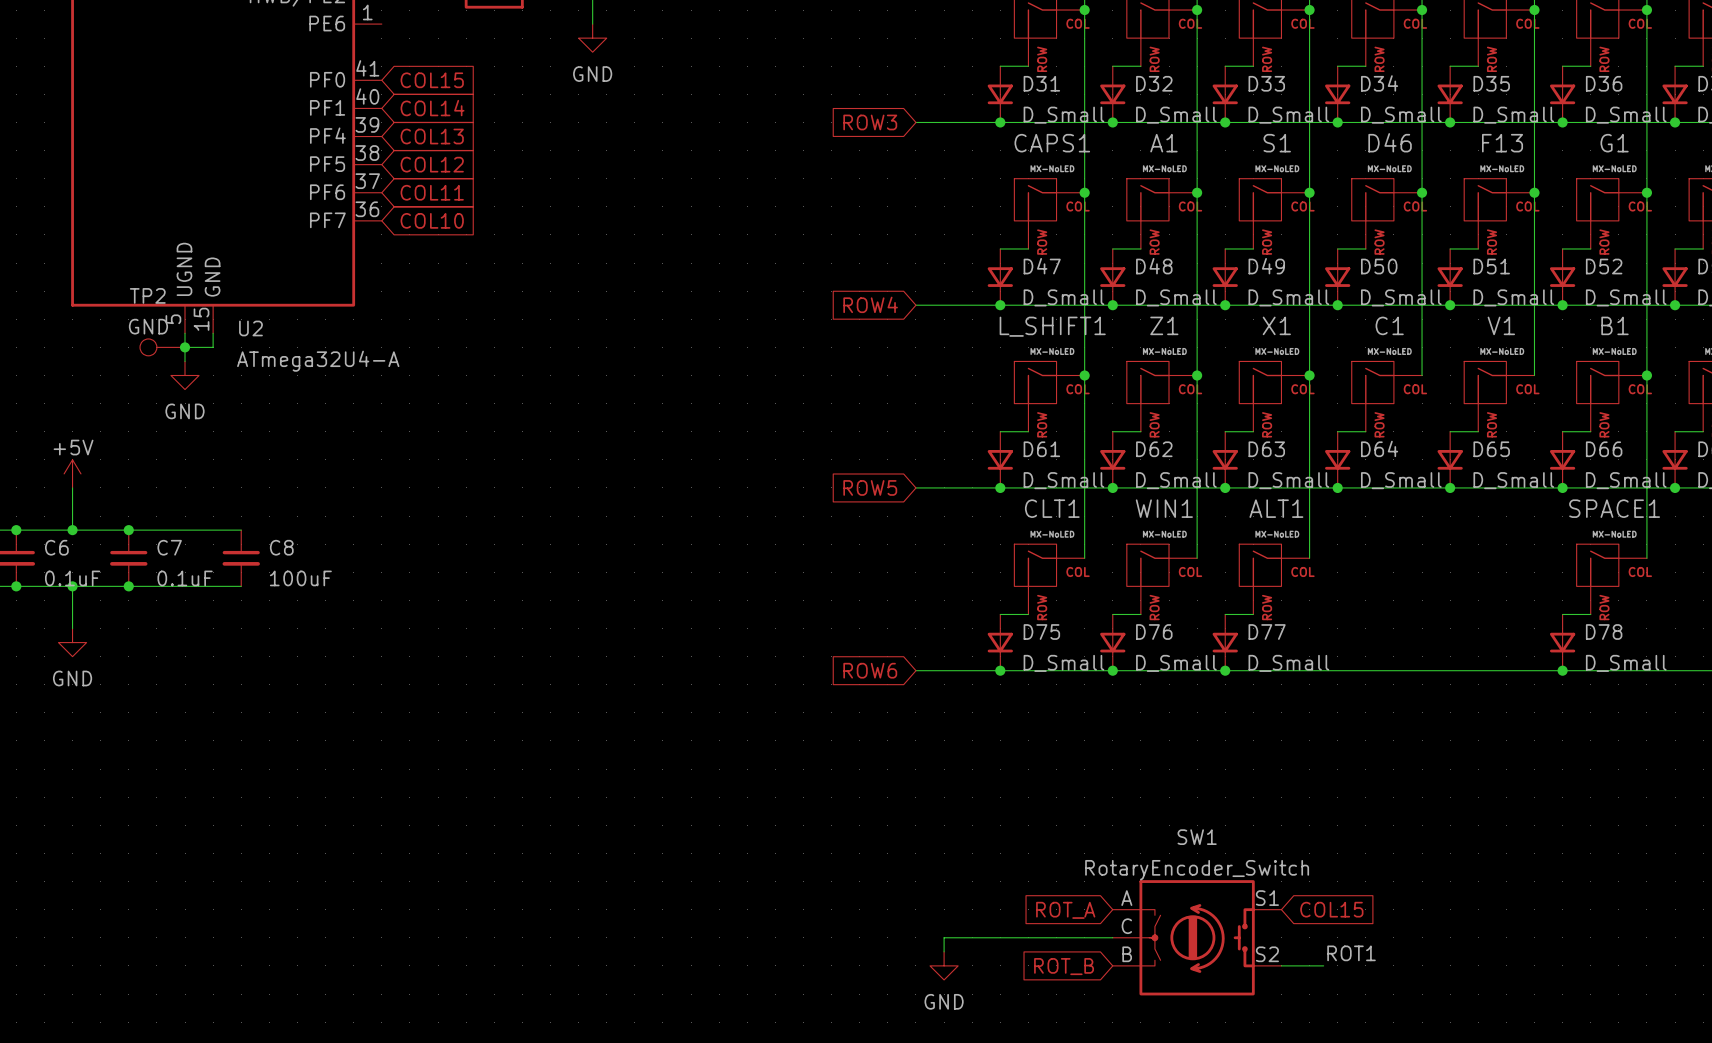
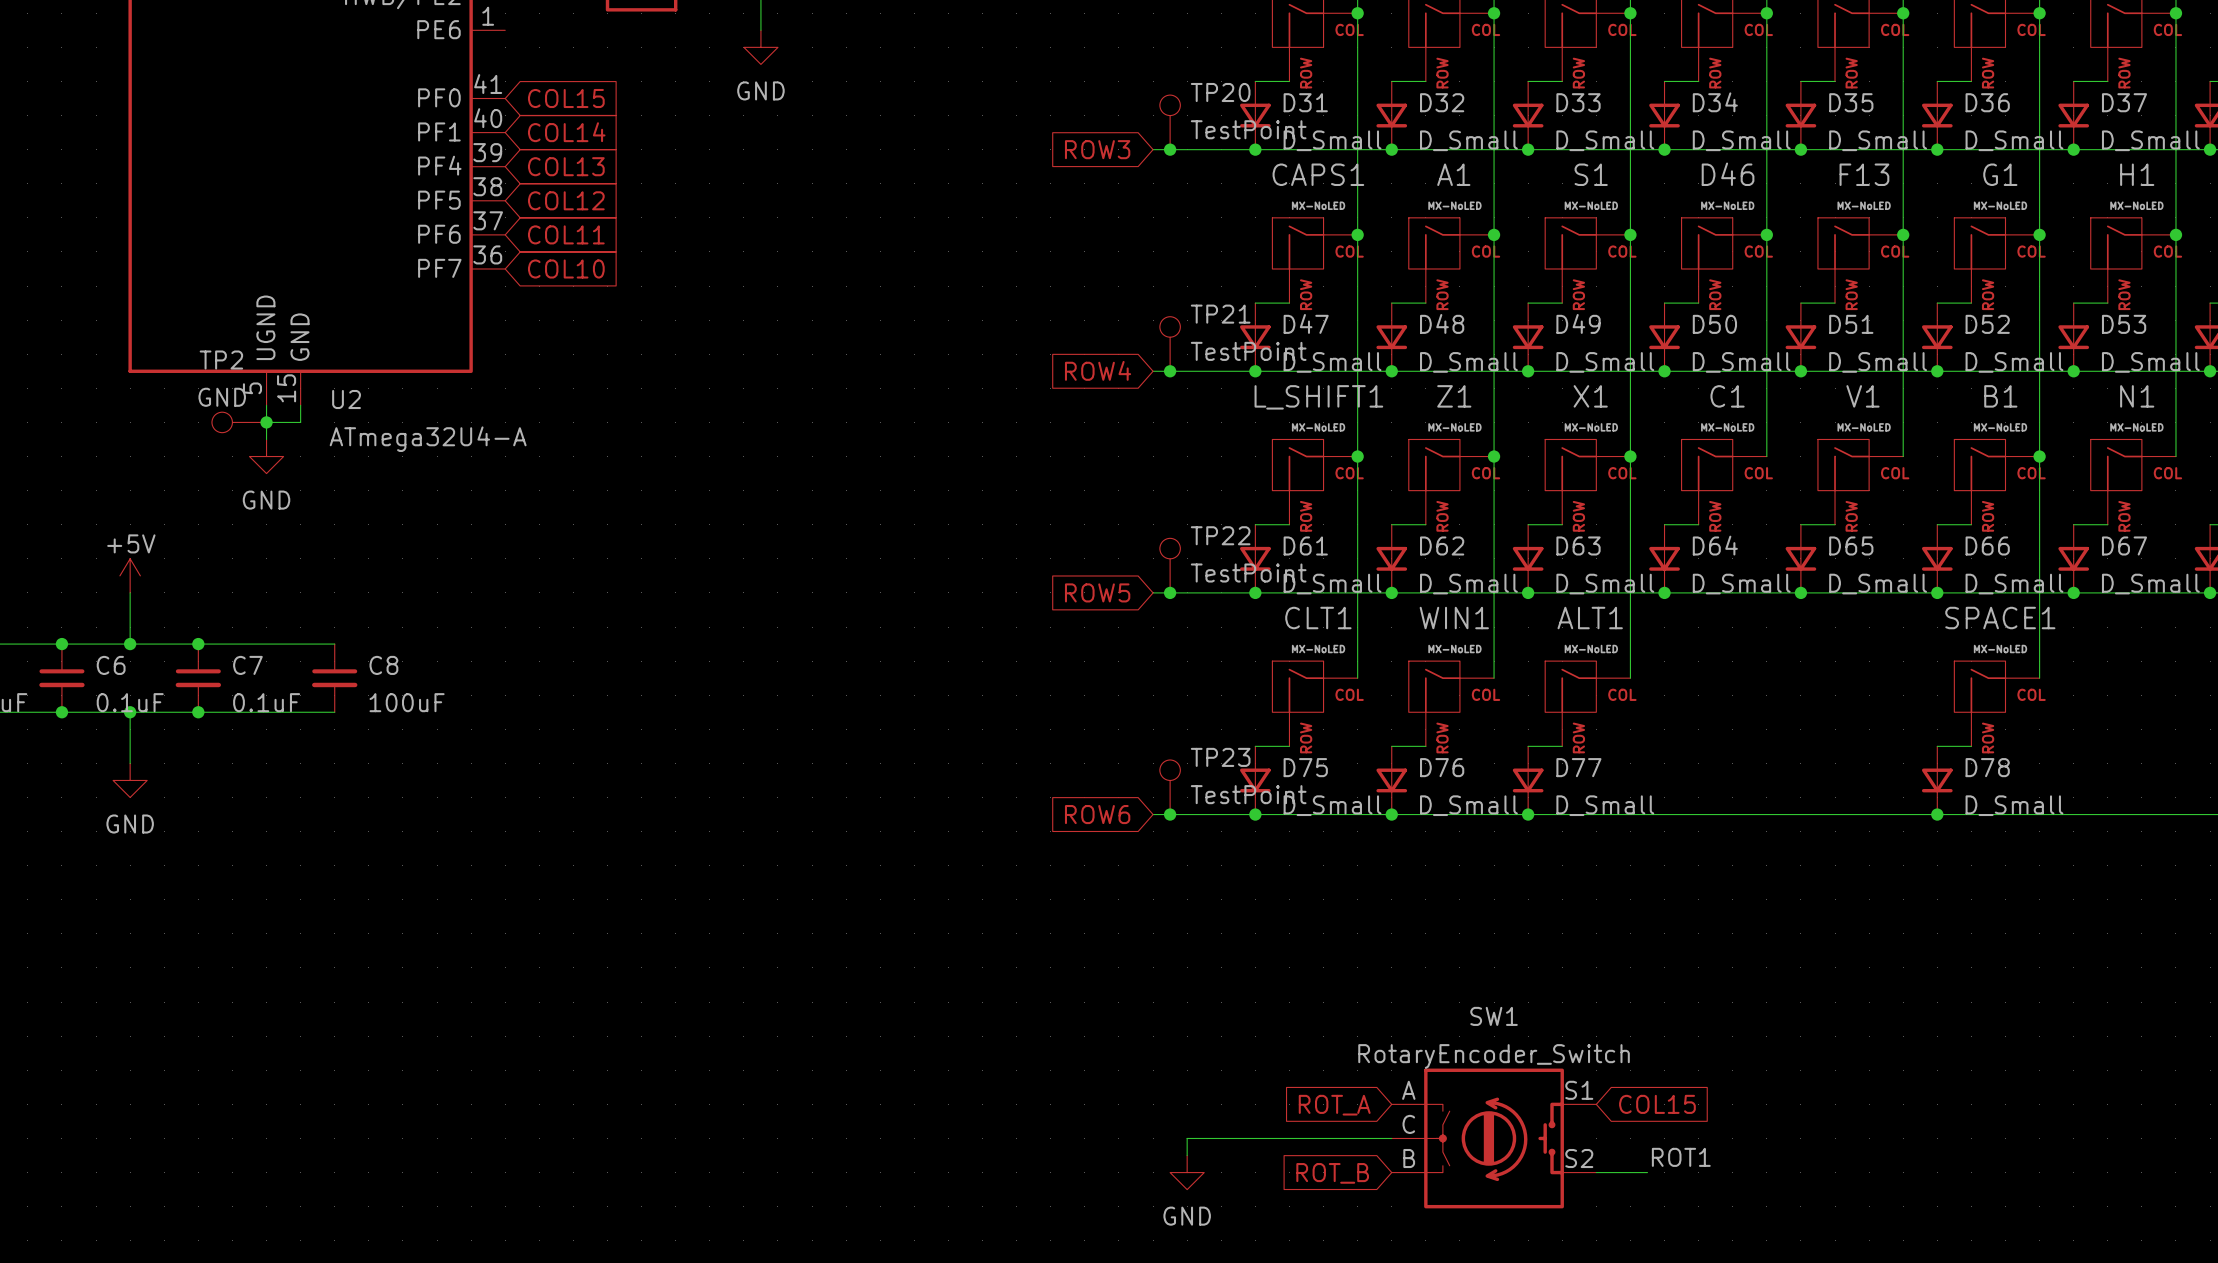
TP20: none -> TestPoint (1170, 122)
junction: none -> (1170, 149)
TP21: none -> TestPoint (1170, 344)
junction: none -> (1170, 371)
TP22: none -> TestPoint (1170, 565)
junction: none -> (1170, 592)
TP23: none -> TestPoint (1170, 787)
junction: none -> (1170, 814)

